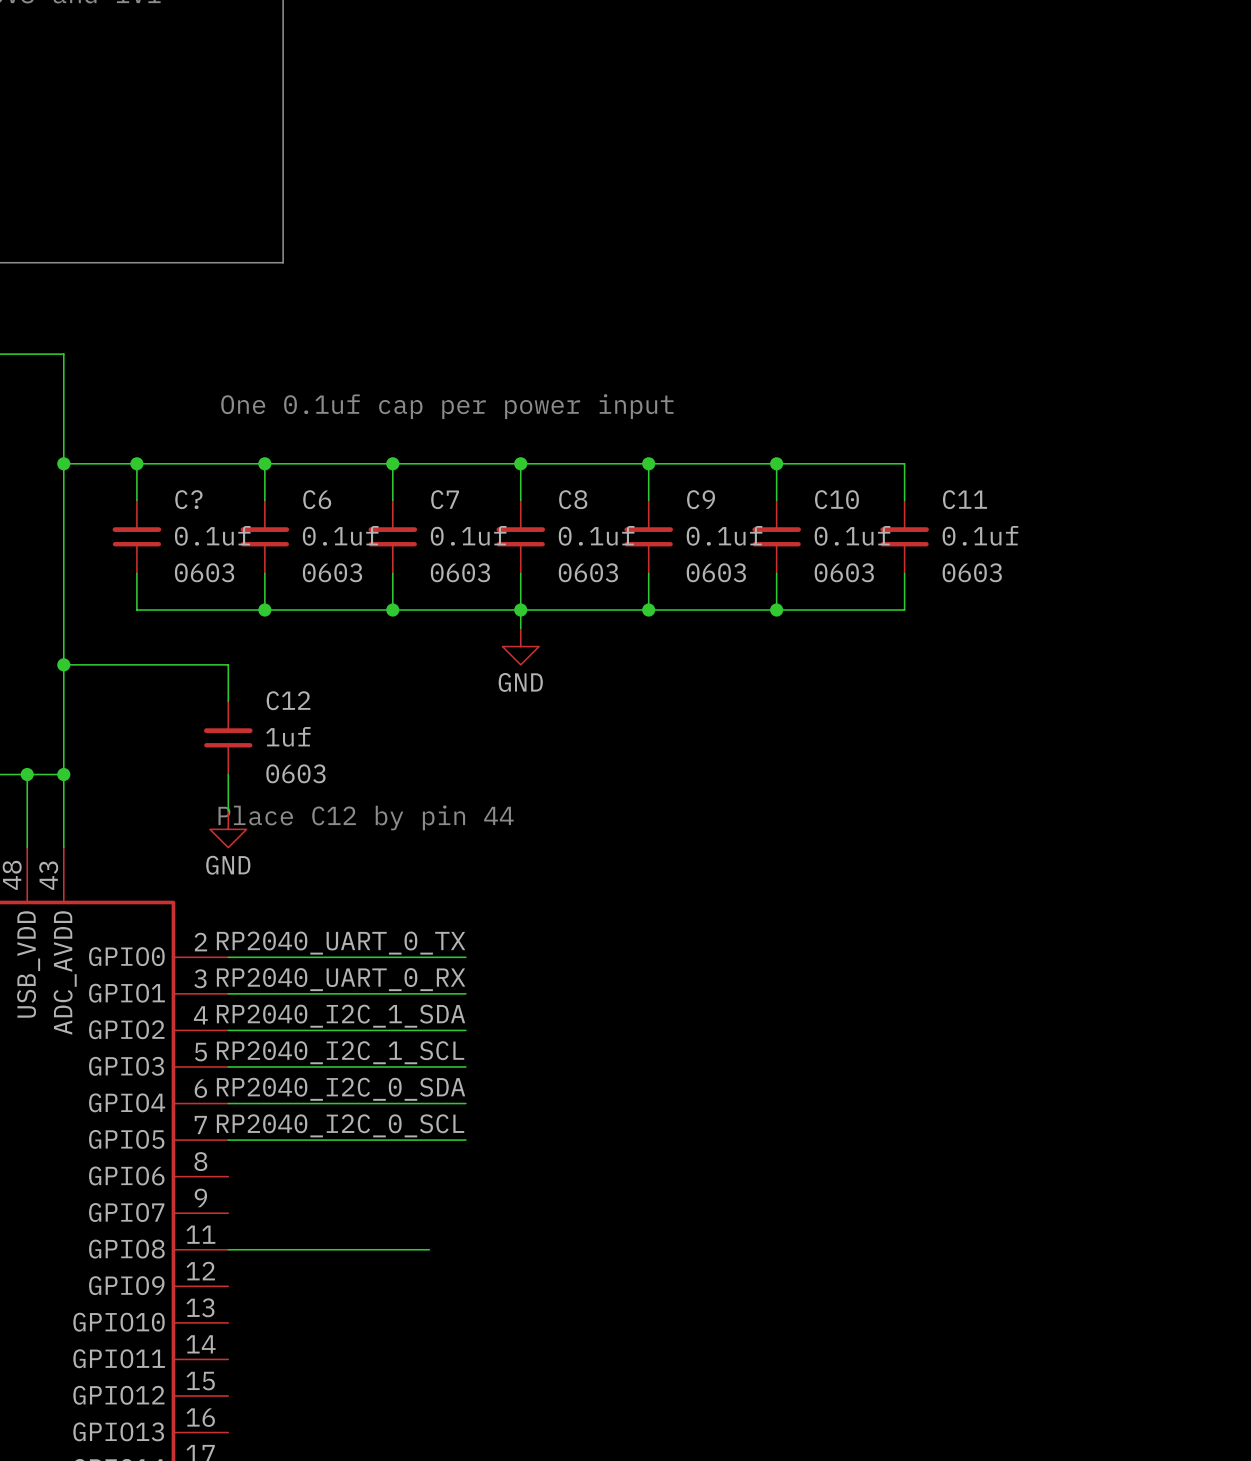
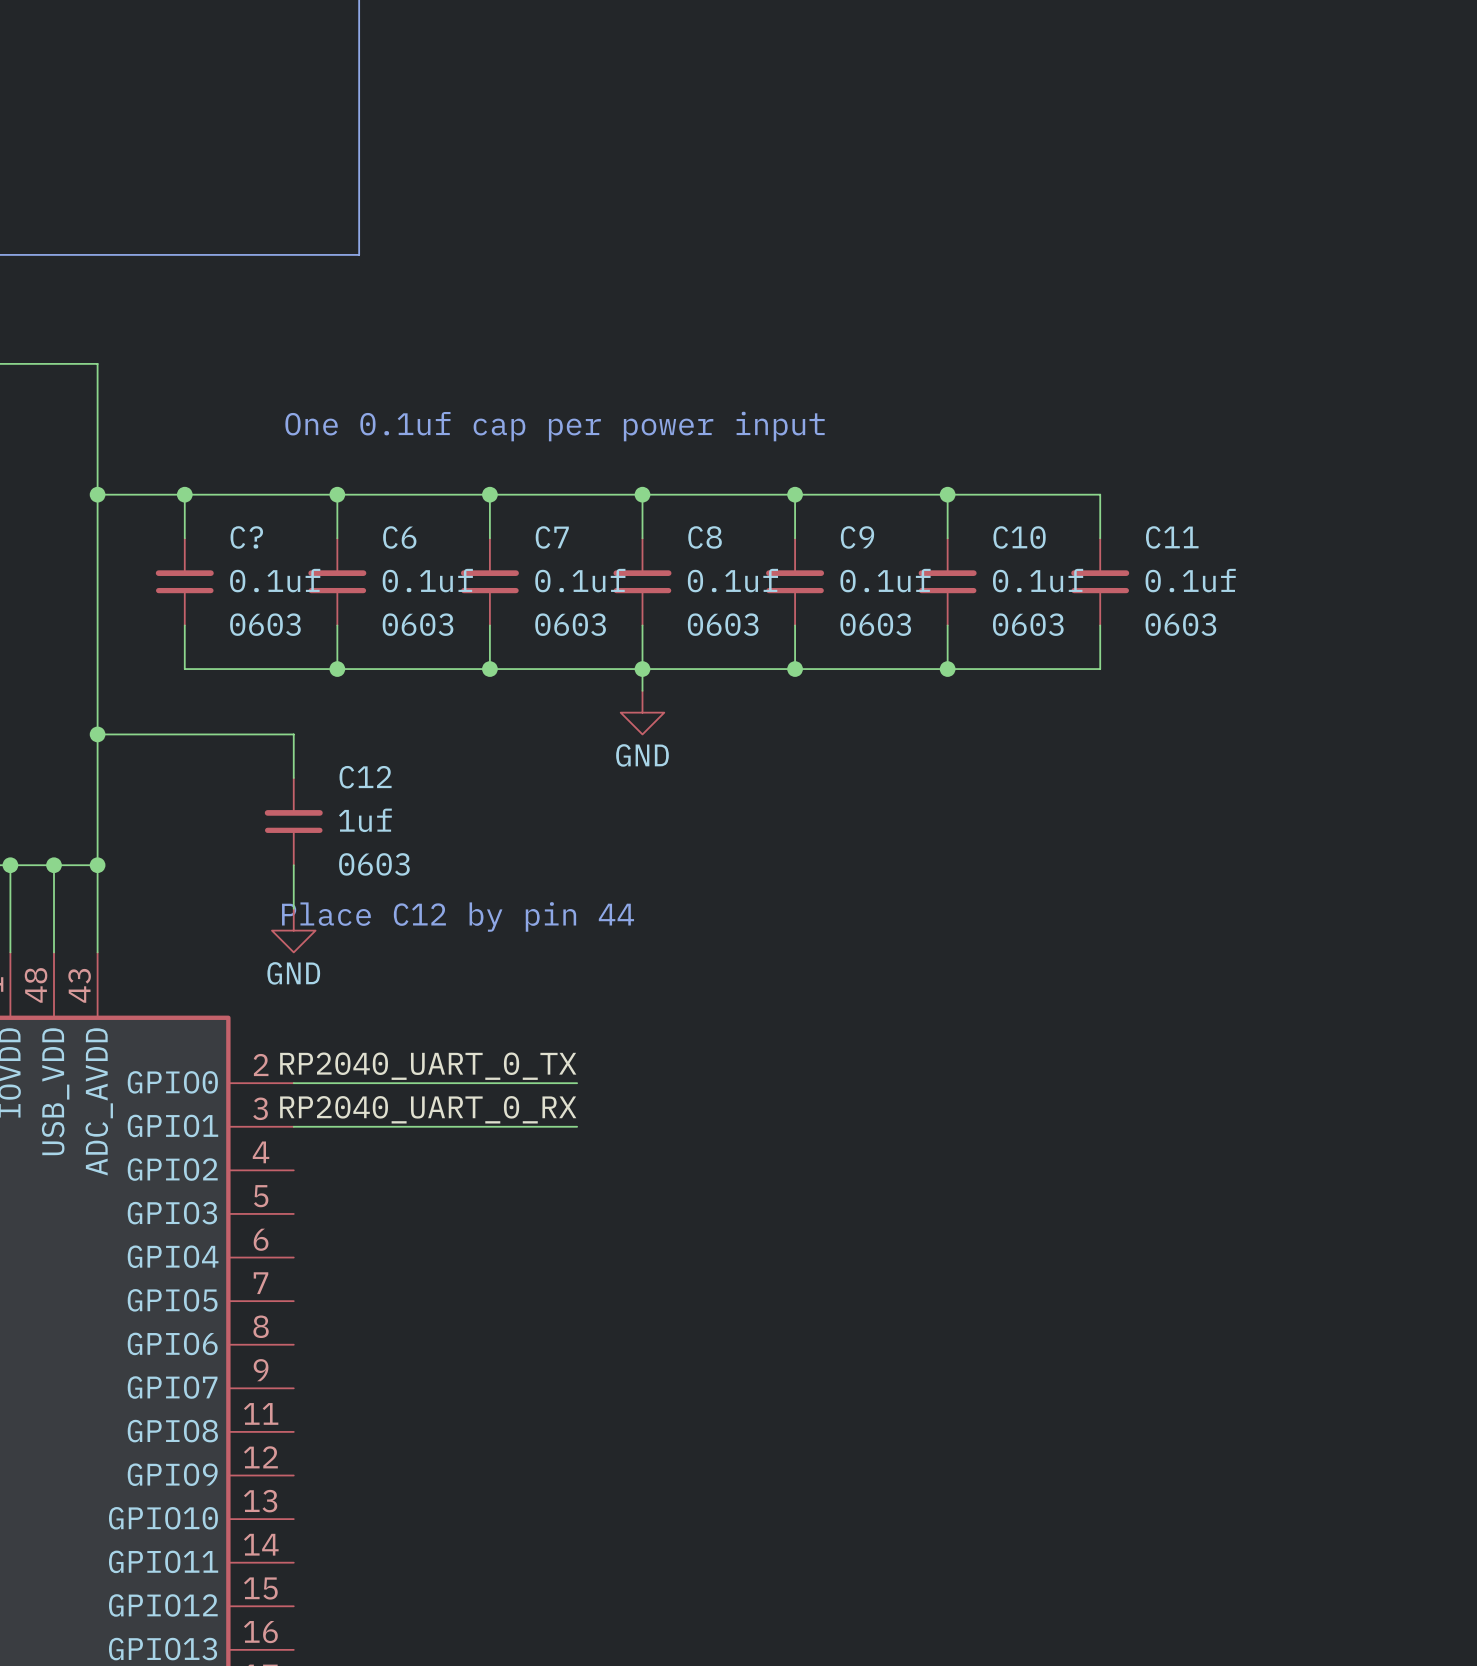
label: RP2040_I2C_1_SDA (341, 1016) -> none
wire: (228, 1030) (465, 1030) -> none
label: RP2040_I2C_1_SCL (340, 1052) -> none
wire: (228, 1066) (465, 1066) -> none
label: RP2040_I2C_0_SDA (341, 1089) -> none
wire: (228, 1103) (465, 1103) -> none
label: RP2040_I2C_0_SCL (340, 1125) -> none
wire: (228, 1140) (465, 1140) -> none
wire: (228, 1249) (429, 1249) -> none

